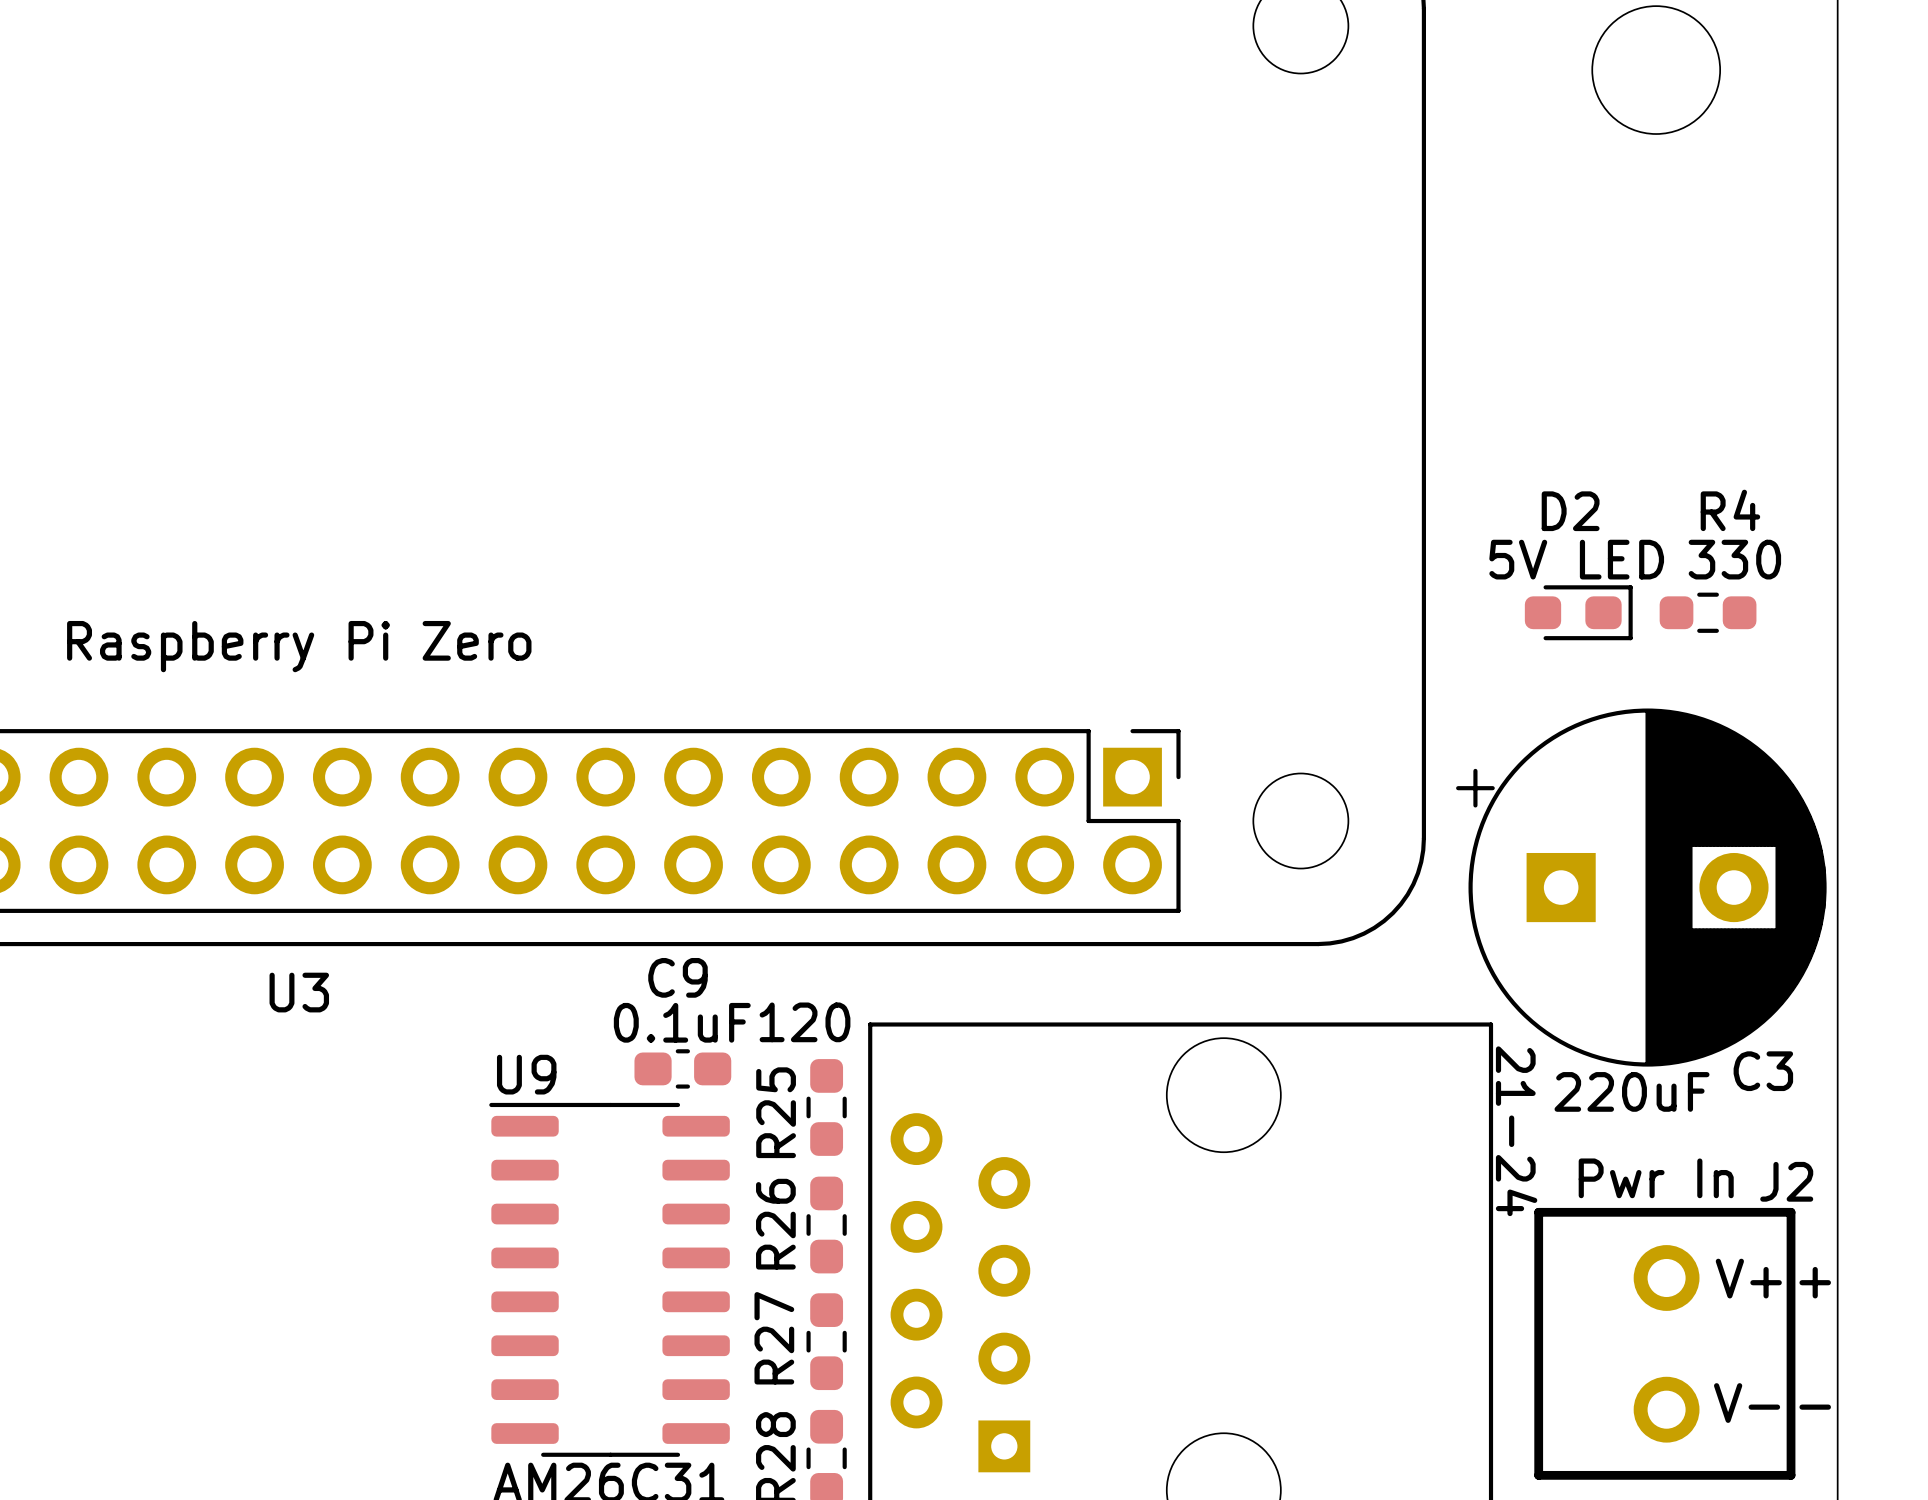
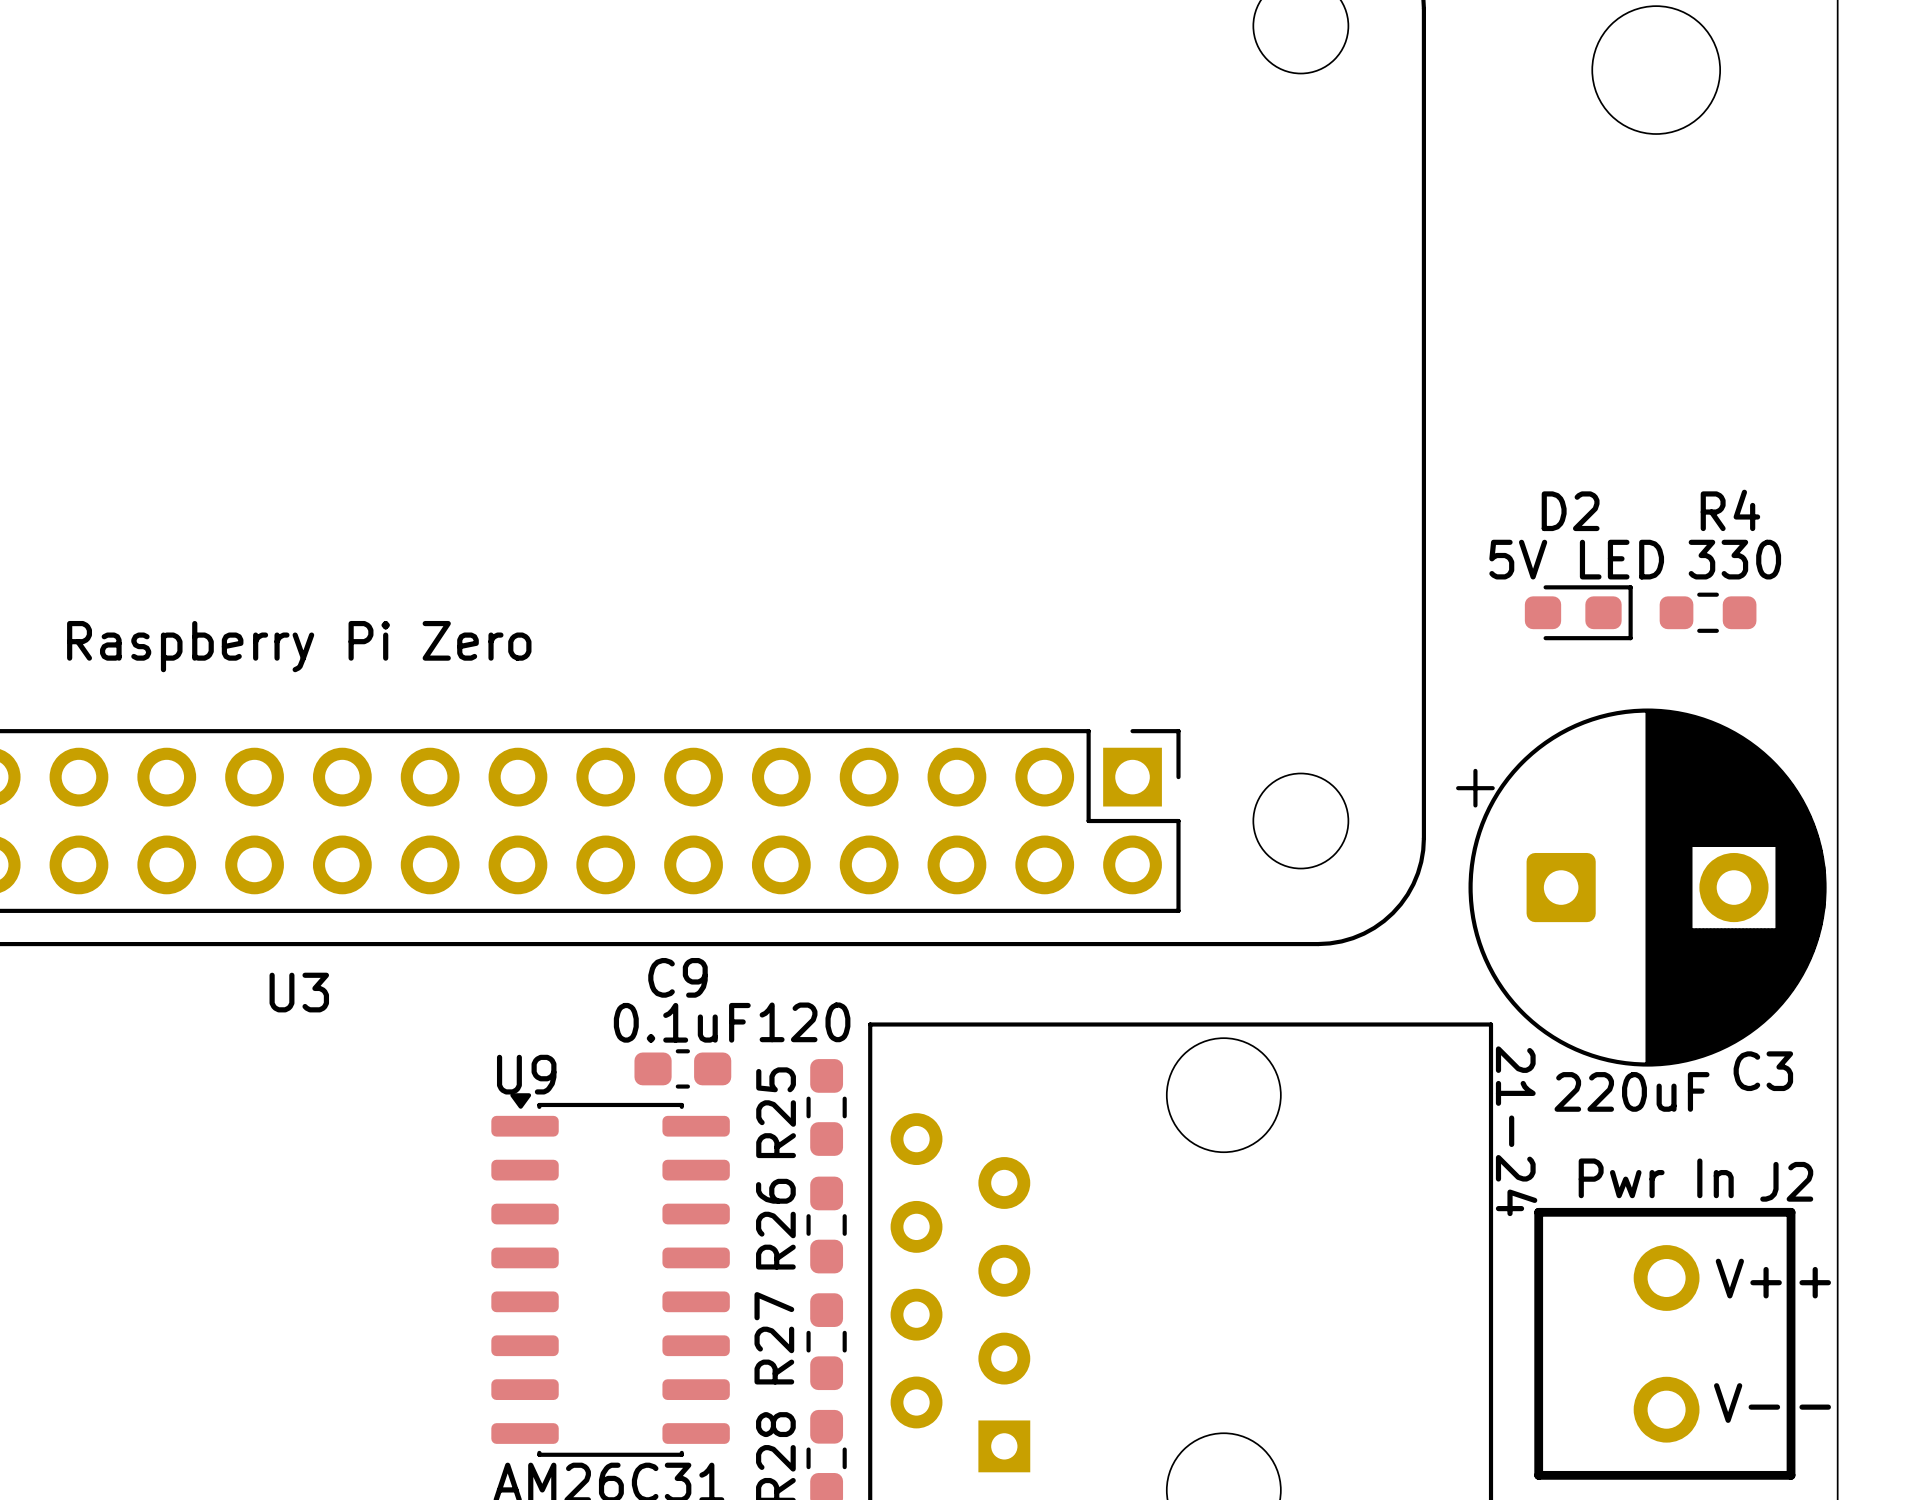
C3 footprint: [1456, 708, 1827, 1067] -> [1456, 708, 1827, 1067]
U9 footprint: [489, 1102, 730, 1457] -> [491, 1093, 730, 1457]

